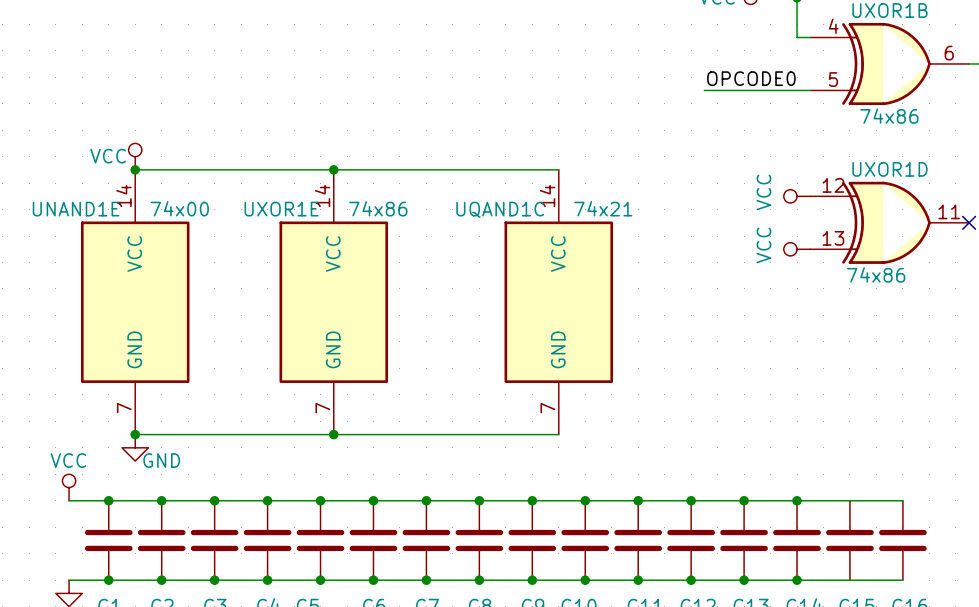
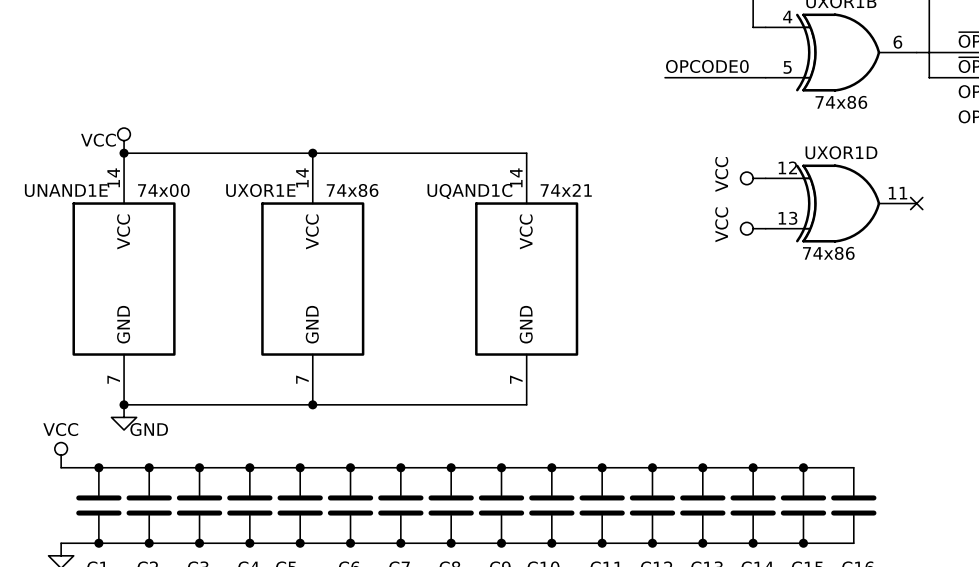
junction: none -> (803, 467)
junction: none -> (803, 543)

